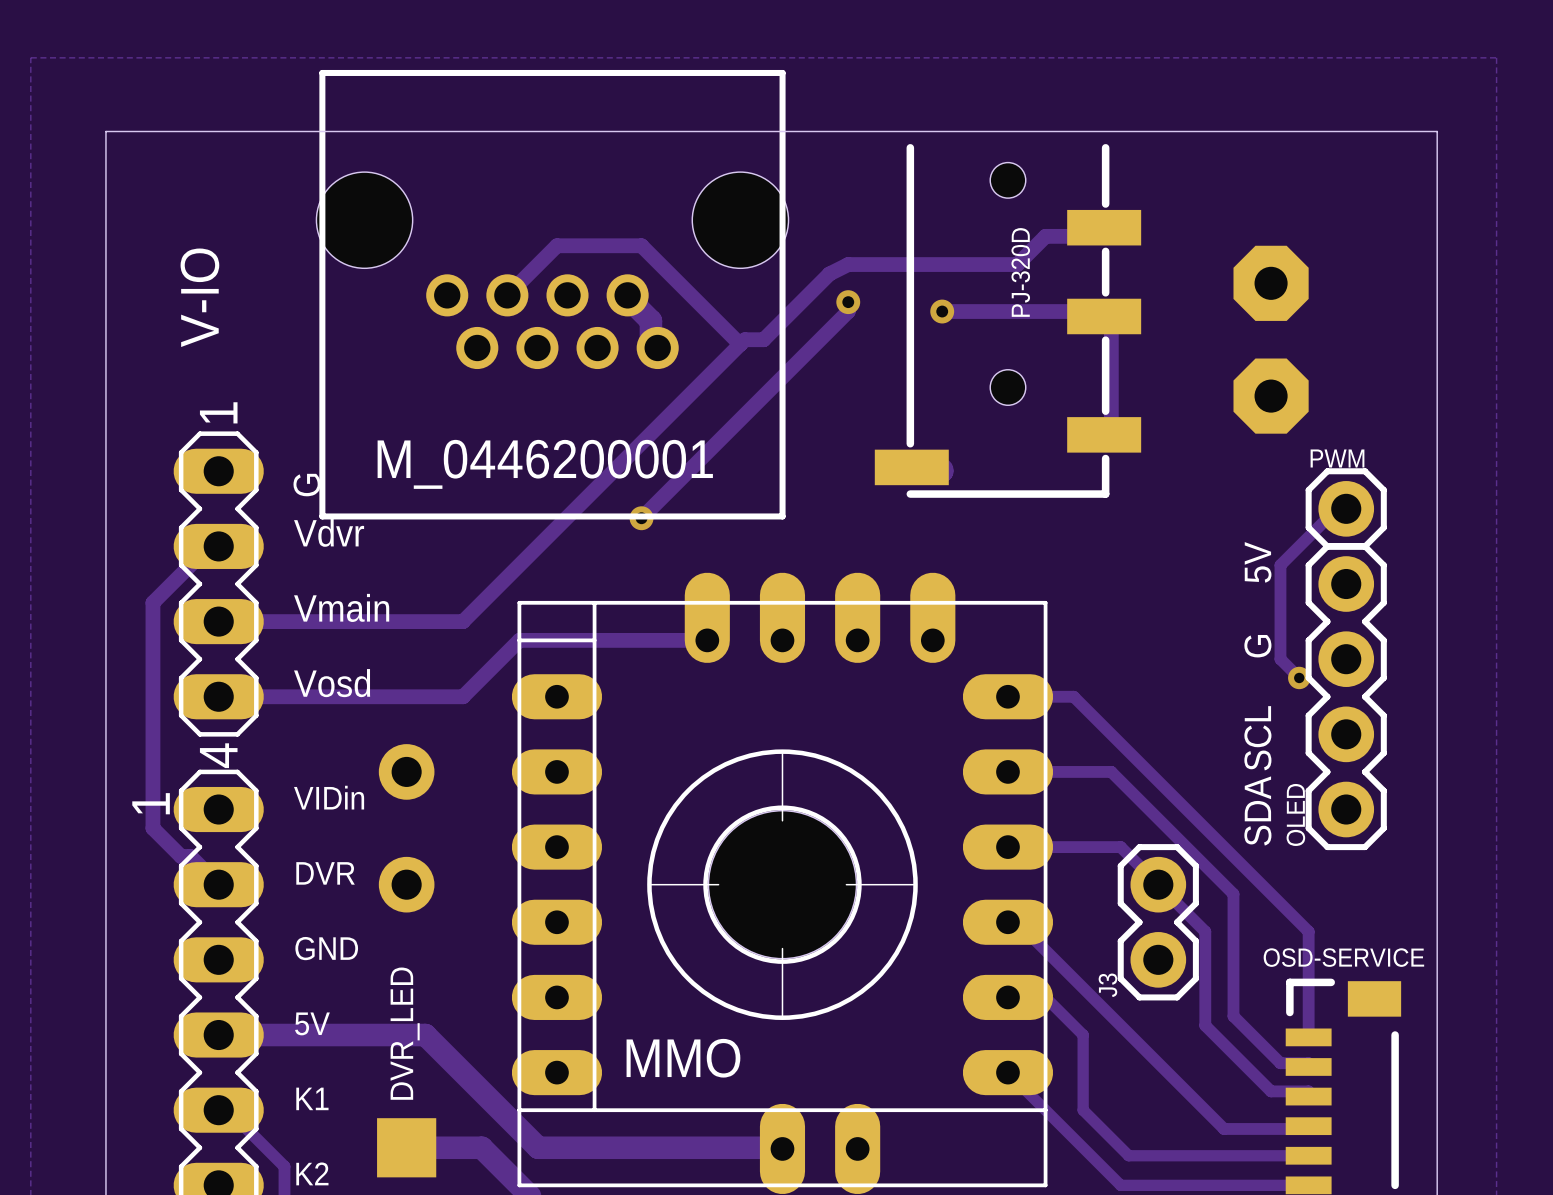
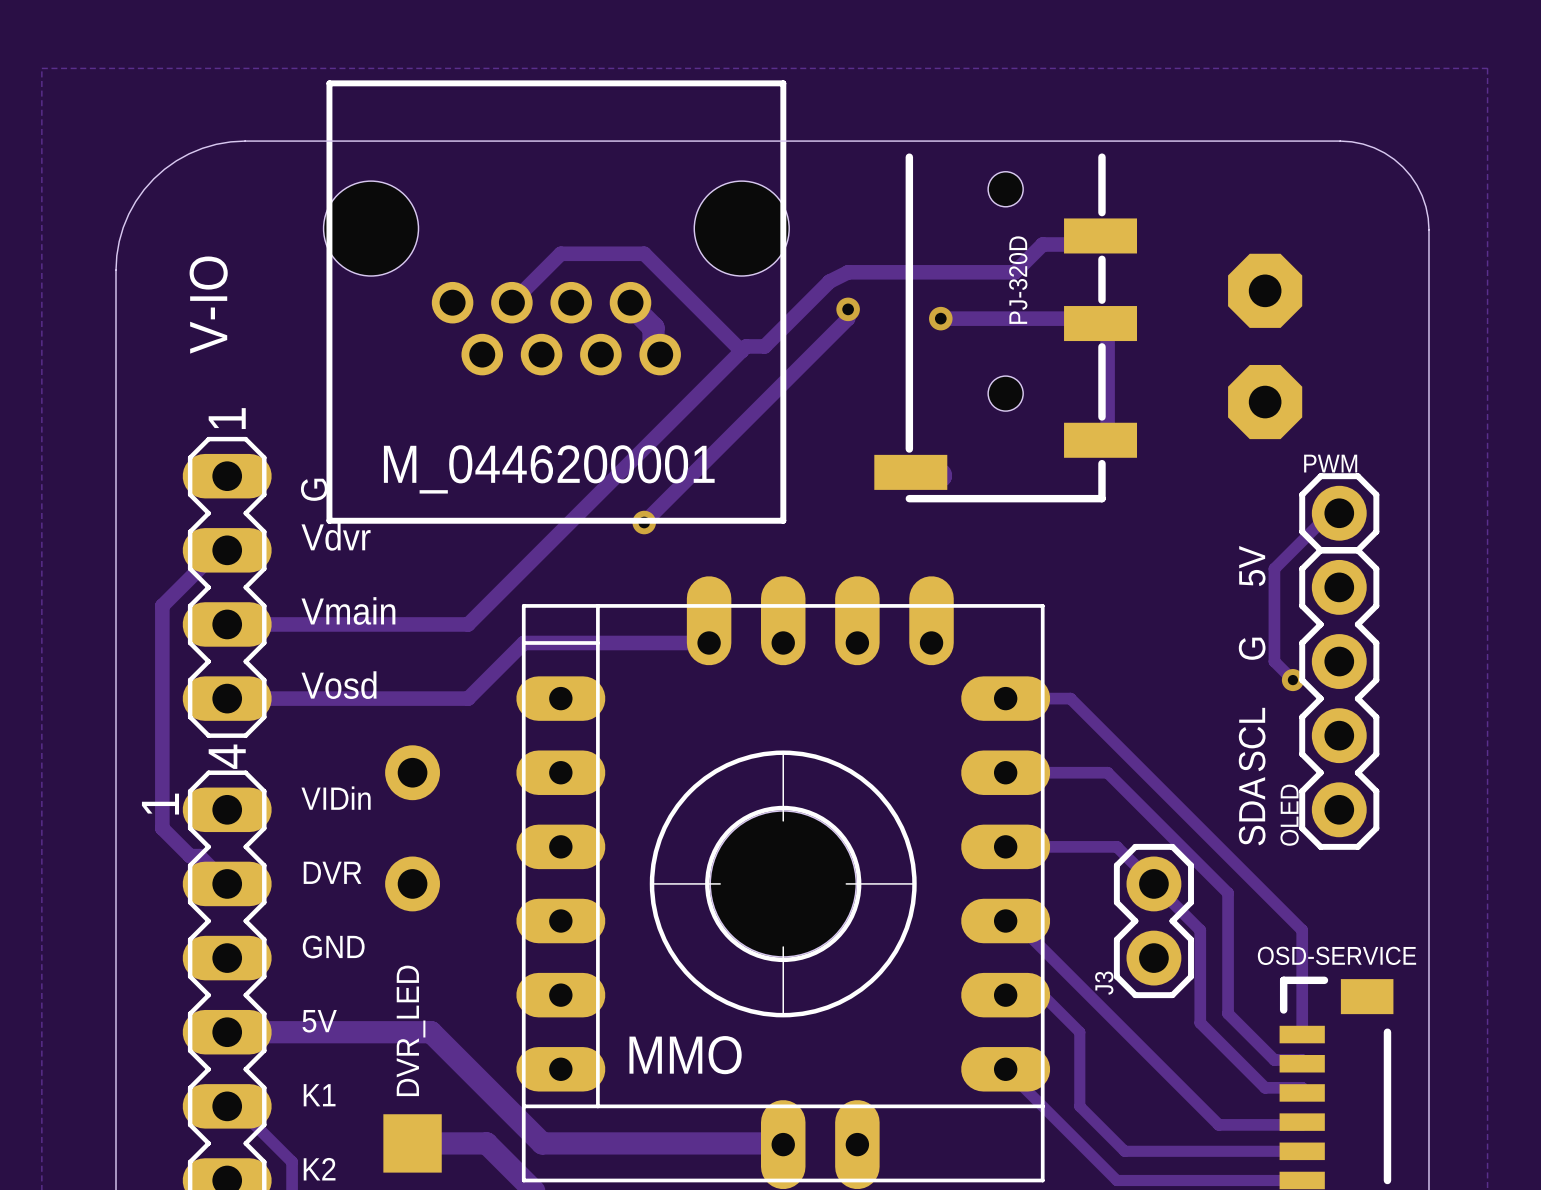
board edge: (236, 131) (105, 131) (105, 262) -> (245, 141) (230, 141) (202, 148) (176, 160) (153, 178) (135, 201) (123, 227) (116, 255) (116, 270)
board edge: (1347, 131) (1437, 131) (1437, 221) -> (1340, 141) (1363, 144) (1374, 147) (1384, 152) (1402, 167) (1417, 185) (1422, 195) (1425, 206) (1428, 229)

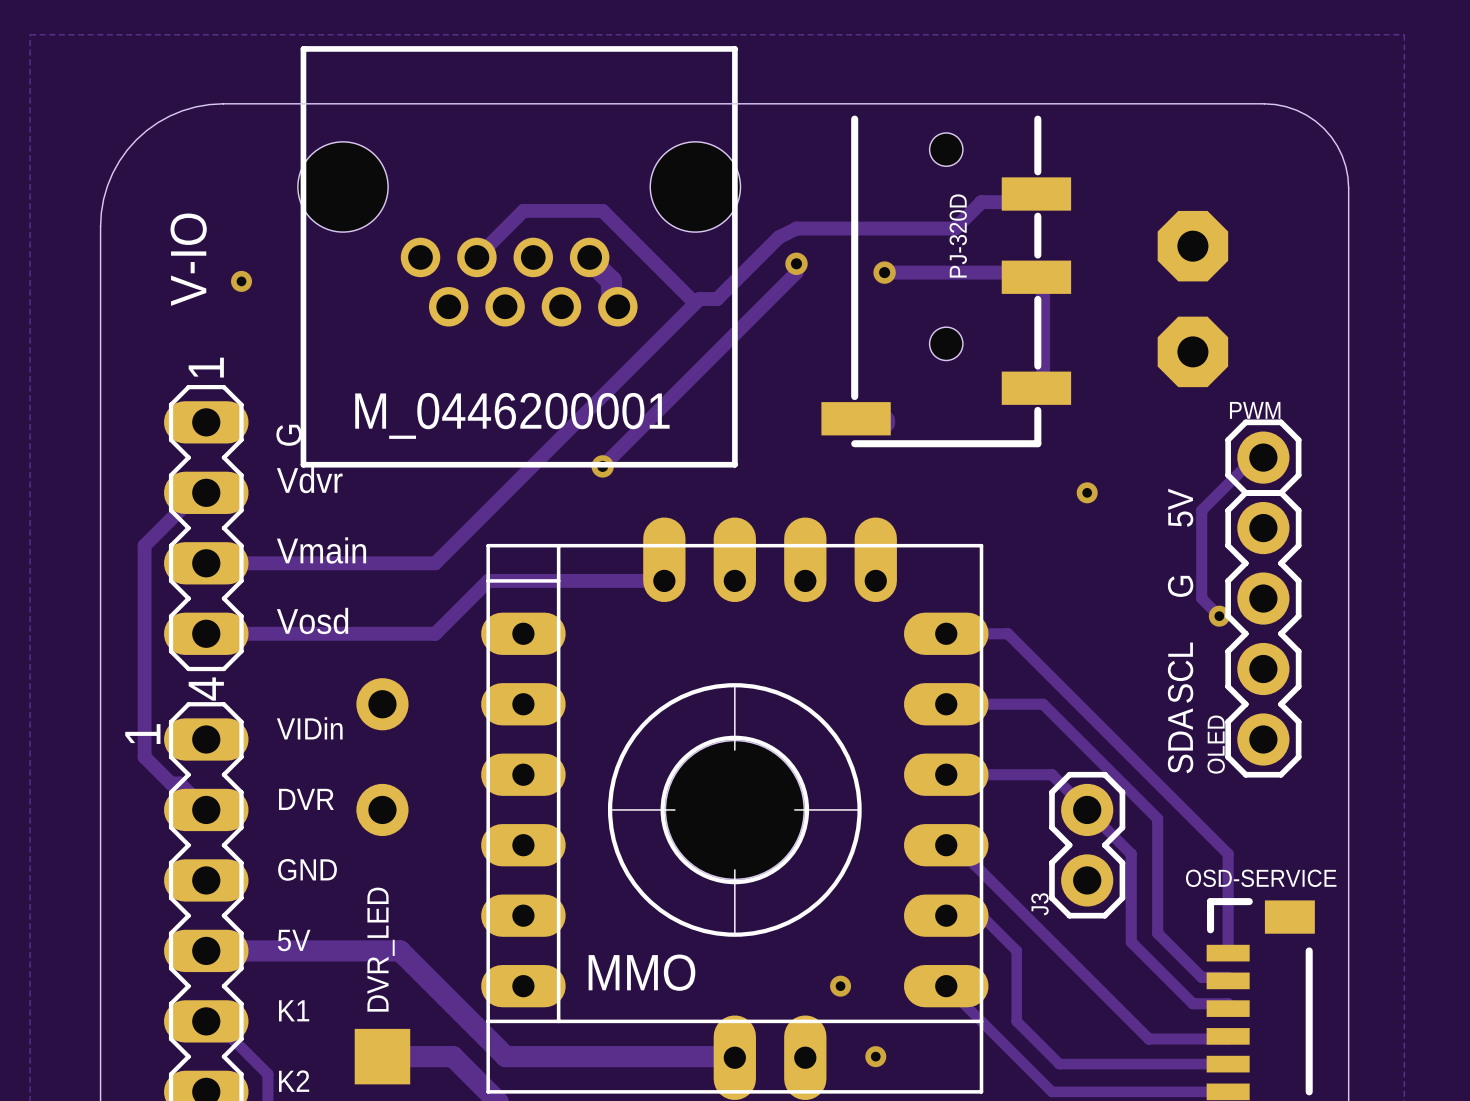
via: none -> (241, 281)
via: none -> (1087, 492)
via: none -> (840, 986)
via: none -> (875, 1056)

